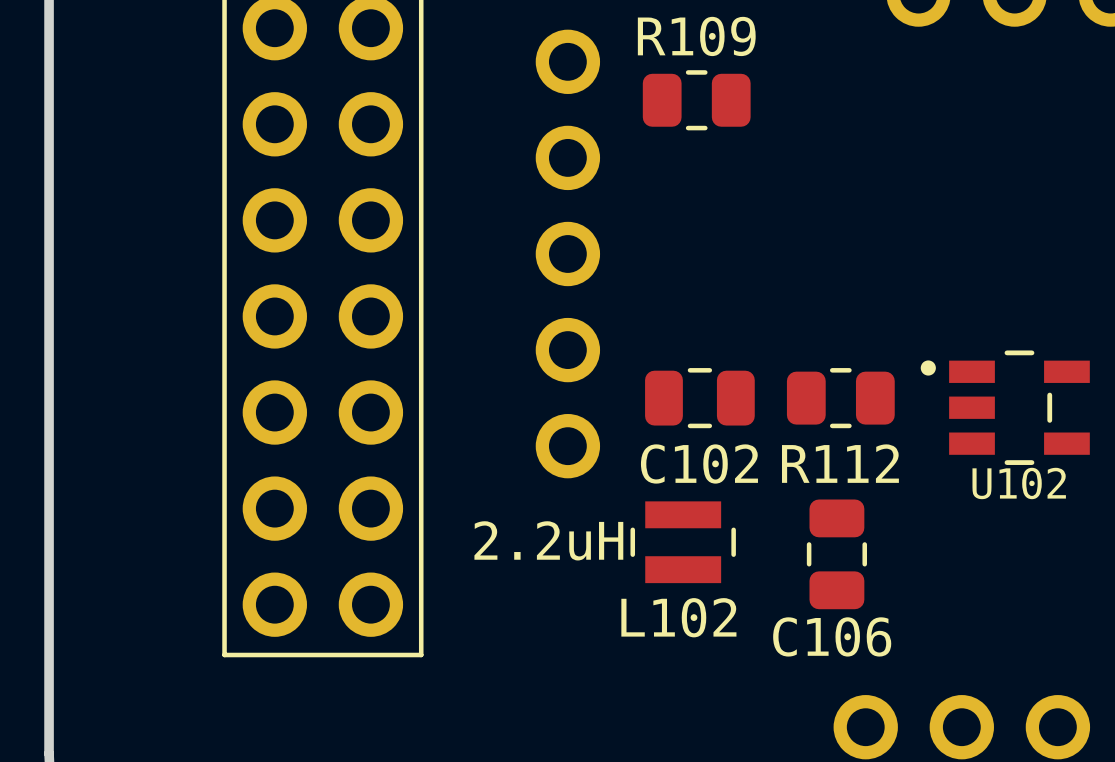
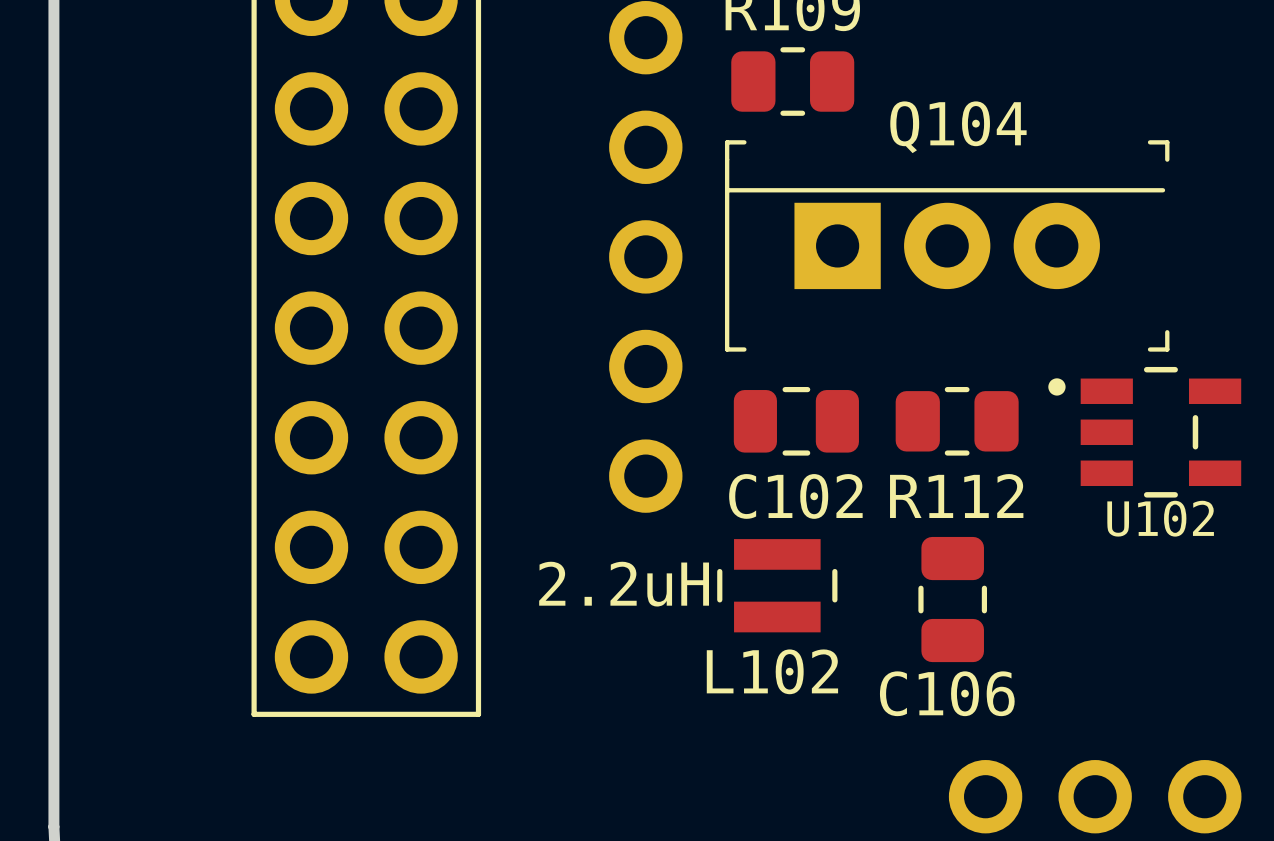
Q104: none -> (947, 245)

